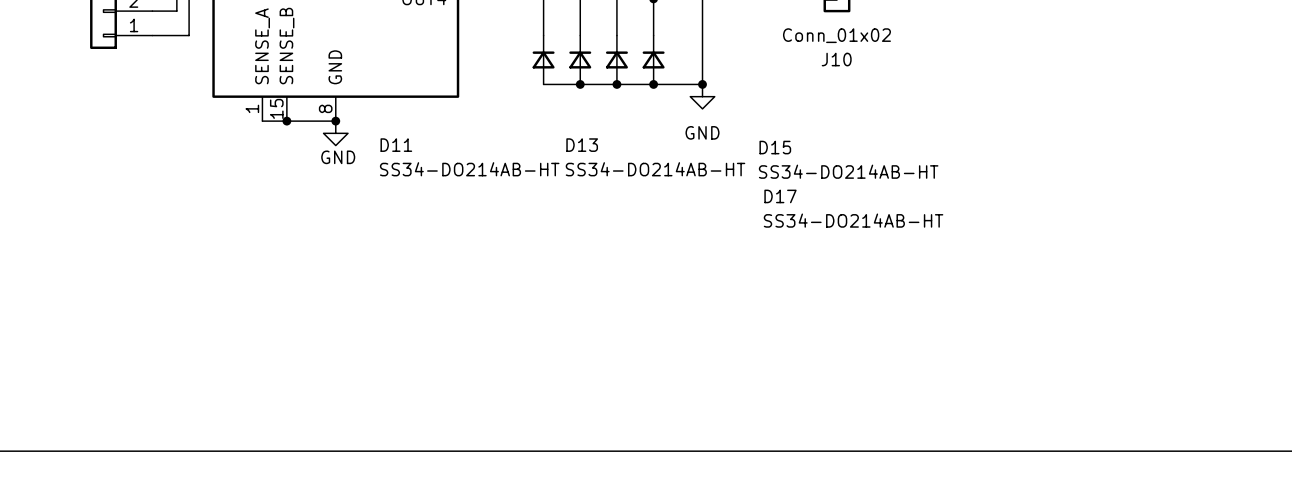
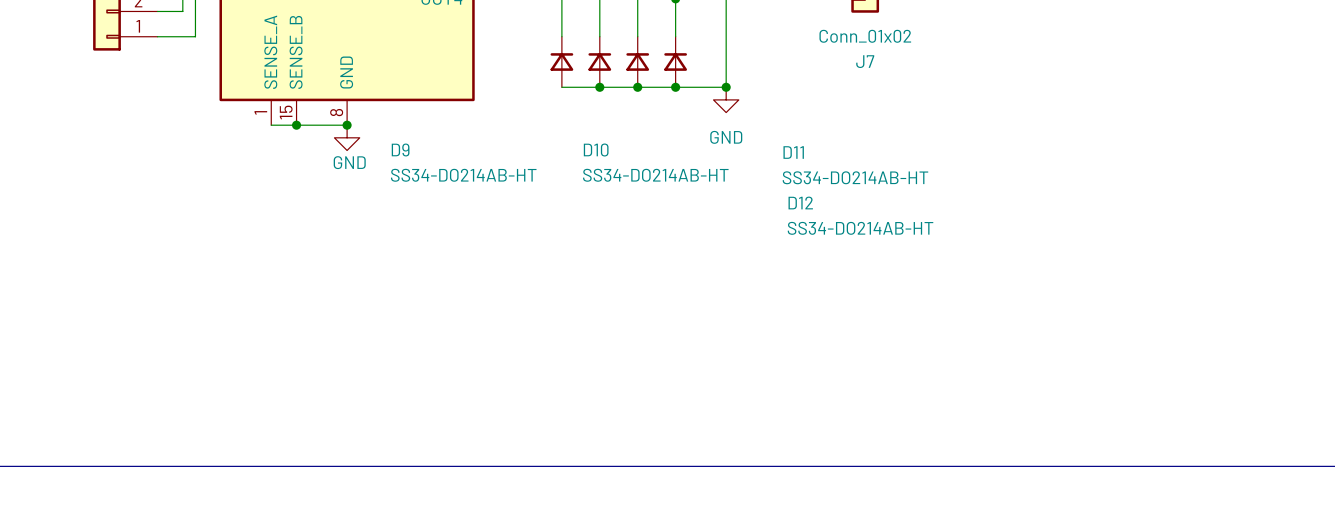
J10 name: J10 (836, 59) -> J7 (865, 61)
D11 name: D11 (396, 145) -> D9 (400, 150)
D13 name: D13 (582, 145) -> D10 (596, 150)
D15 name: D15 (775, 147) -> D11 (793, 152)
D17 name: D17 (780, 196) -> D12 (800, 202)

